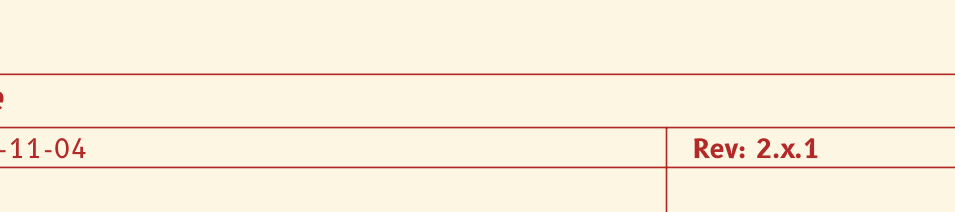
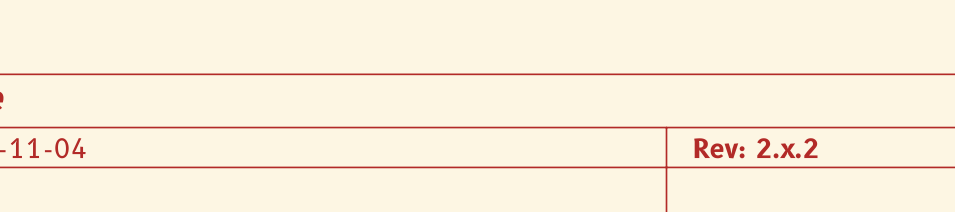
title block: Rev: 2.x.1 (755, 148) -> Rev: 2.x.2 (755, 148)

